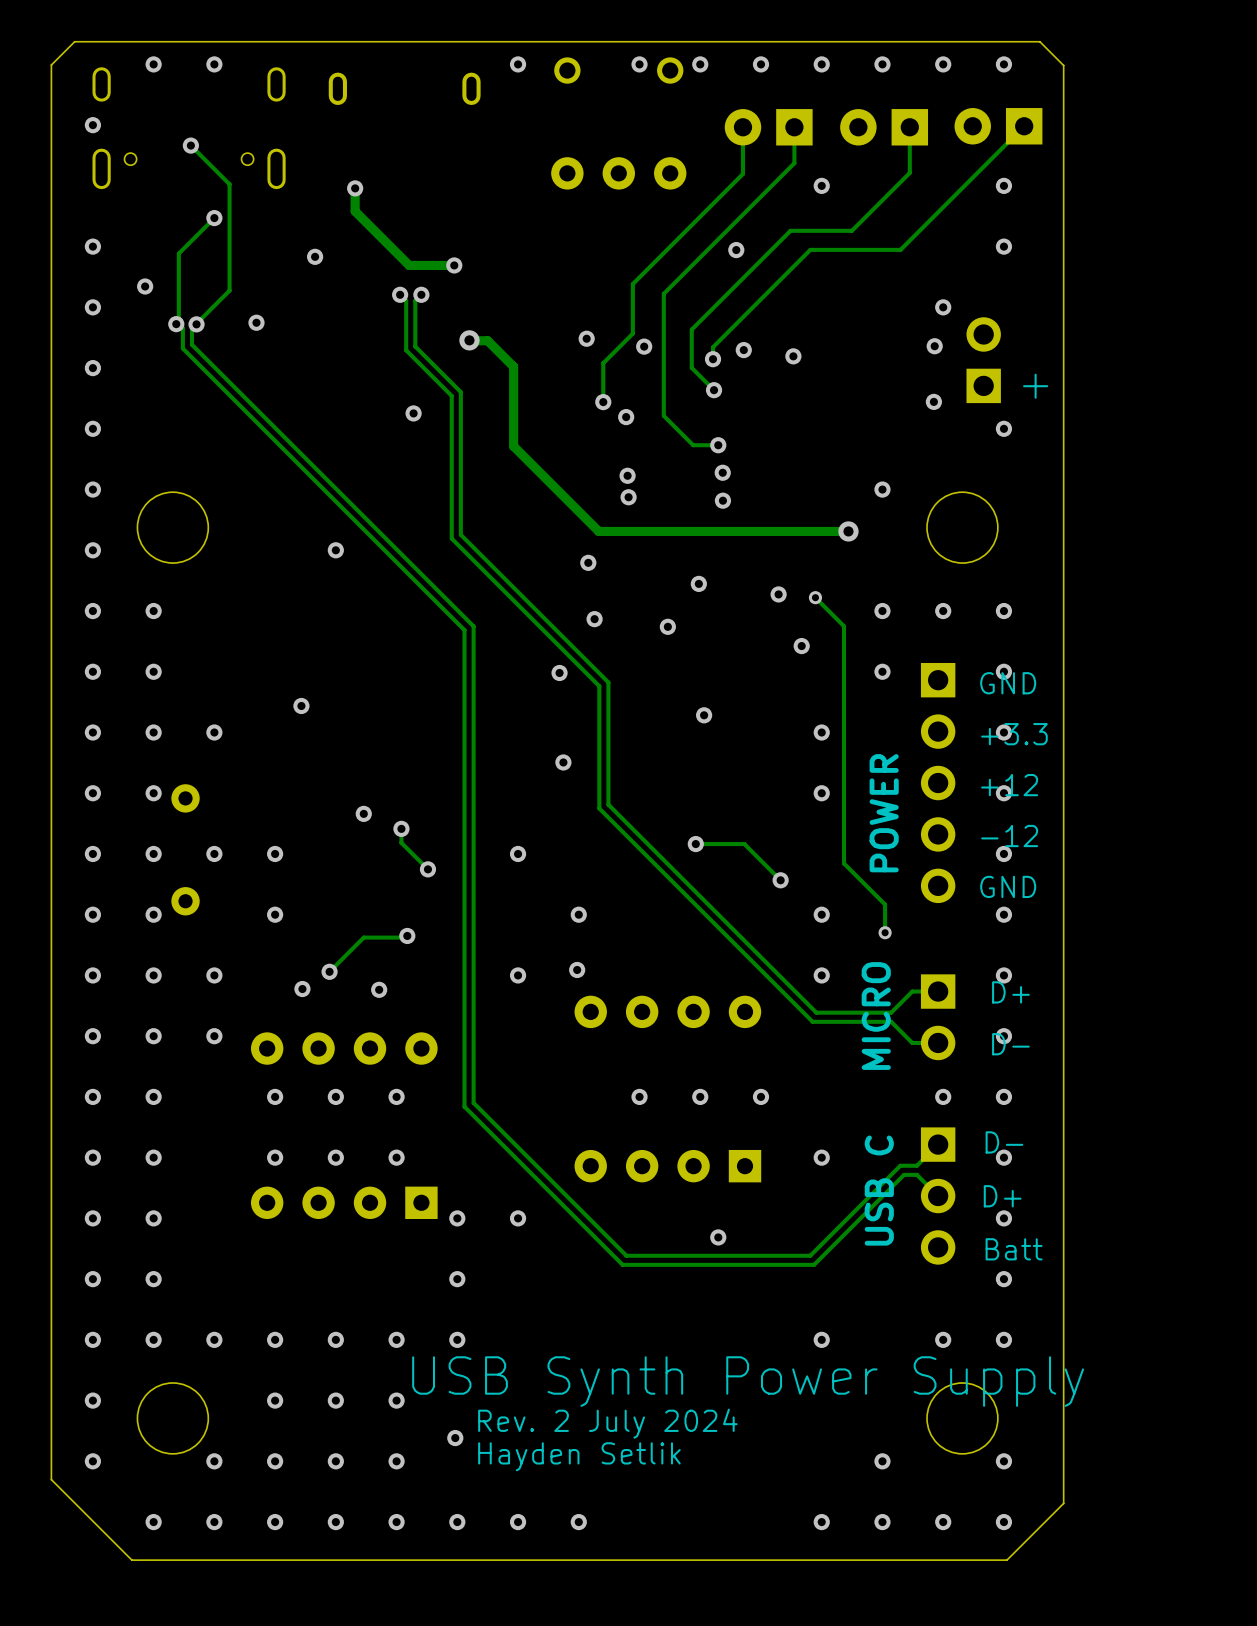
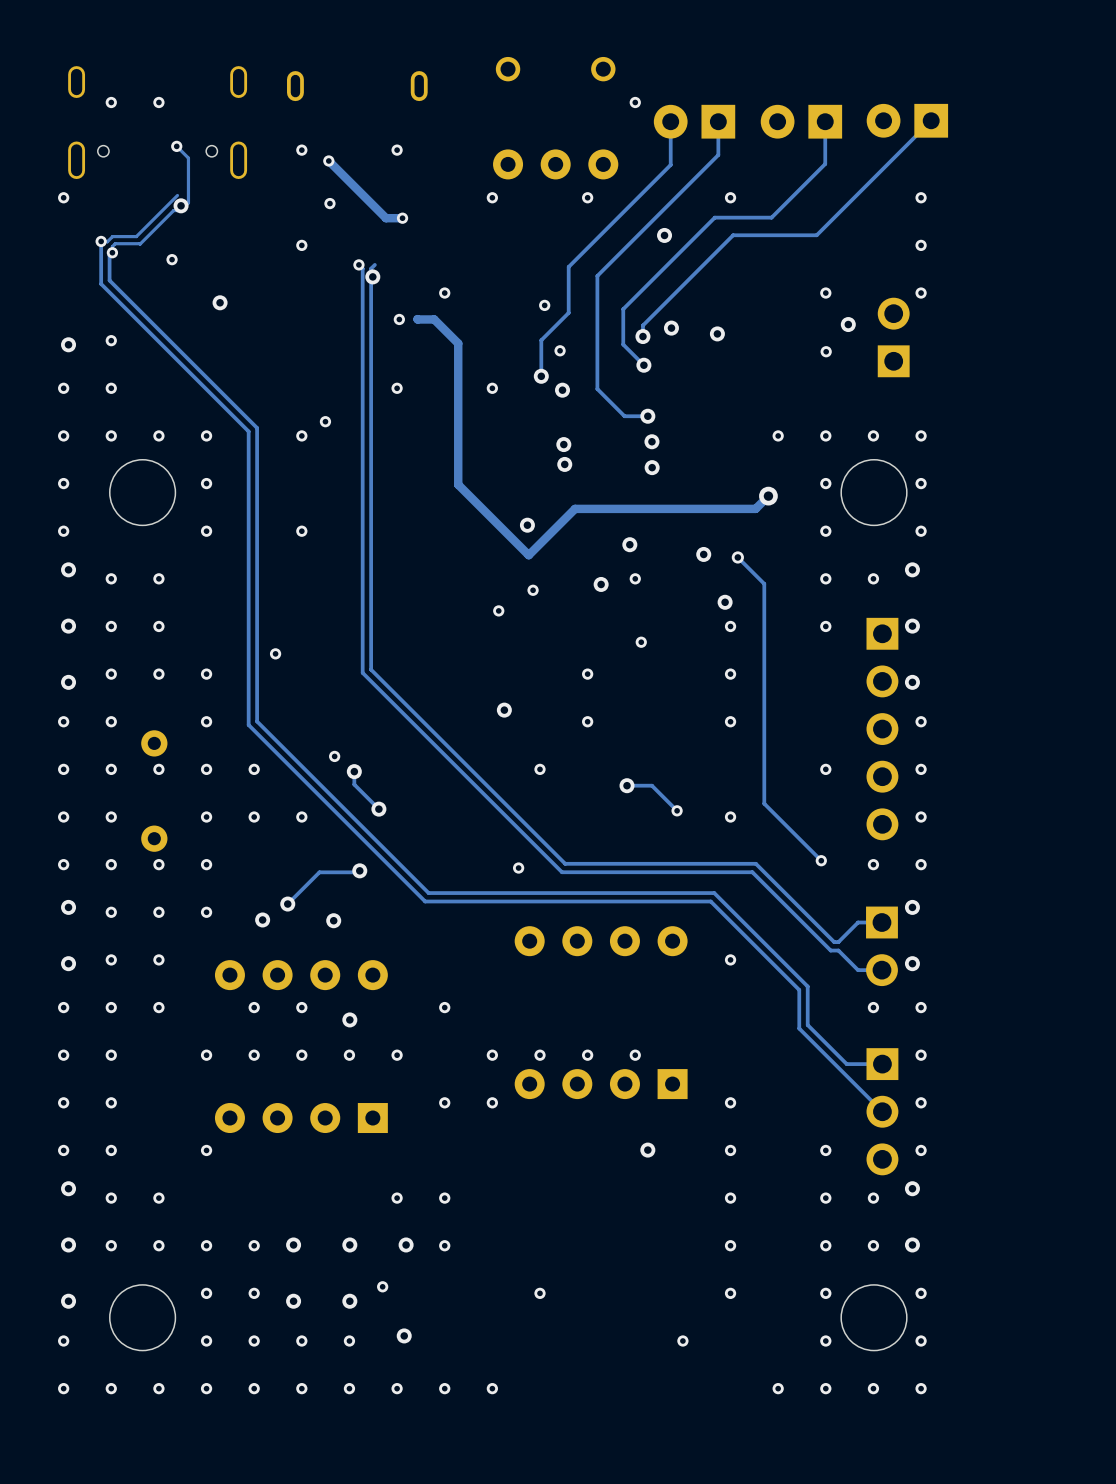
board edge: (1039, 41) (74, 41) (51, 65) (51, 1479) (131, 1560) (1006, 1560) (1063, 1503) (1063, 65) (1039, 41) -> none
via: (153, 64) -> none
via: (214, 64) -> none
via: (518, 64) -> none
via: (639, 64) -> none
via: (700, 64) -> none
via: (761, 64) -> none
via: (821, 64) -> none
via: (882, 64) -> none
via: (943, 64) -> none
via: (1003, 64) -> none
via: none -> (111, 102)
via: none -> (158, 102)
via: none -> (635, 102)
via: (92, 125) -> none
track: (190, 145) (229, 184) (229, 290) (192, 328) (192, 344) (473, 626) (473, 1102) (626, 1255) (810, 1255) (900, 1165) (916, 1165) (938, 1144) -> none
via: (190, 145) -> none
track: none -> (176, 146) (188, 158) (188, 202) (180, 210) (173, 210) (140, 244) (115, 243) (109, 255) (109, 280) (257, 428) (257, 721) (428, 893) (714, 893) (807, 986) (807, 1025) (846, 1064) (882, 1064)
via: none -> (176, 146)
via: none -> (301, 150)
via: none -> (397, 150)
track: none -> (328, 160) (386, 218) (402, 218)
via: none -> (328, 160)
via: (821, 185) -> none
via: (1003, 185) -> none
track: (355, 188) (355, 211) (409, 265) (454, 265) -> none
via: (355, 188) -> none
track: none -> (177, 195) (136, 236) (112, 236) (107, 241) (101, 241) (101, 283) (248, 431) (248, 724) (425, 901) (710, 901) (799, 989) (799, 1028) (882, 1111)
via: none -> (63, 197)
via: none -> (492, 197)
via: none -> (587, 197)
via: none -> (730, 197)
via: none -> (921, 197)
via: none -> (329, 203)
track: (214, 218) (178, 253) (178, 324) (182, 328) (182, 348) (464, 630) (464, 1106) (622, 1264) (814, 1264) (904, 1174) (916, 1174) (938, 1196) -> none
via: none -> (402, 218)
via: (92, 246) -> none
via position: (1003, 246) -> (921, 245)
via: none -> (101, 241)
via: (315, 256) -> none
via: none -> (301, 245)
via: (454, 265) -> none
via: none -> (112, 252)
via: none -> (172, 259)
track: none -> (358, 264) (362, 268) (362, 672) (562, 872) (752, 872) (830, 950) (838, 950) (858, 970) (881, 970)
track: none -> (374, 264) (371, 268) (371, 669) (565, 863) (755, 863) (834, 942) (838, 942) (858, 922) (881, 922)
via: (145, 286) -> none
track: (400, 294) (406, 300) (406, 350) (451, 395) (451, 538) (599, 686) (599, 808) (812, 1021) (891, 1021) (912, 1042) (938, 1042) -> none
via position: (400, 294) -> (358, 264)
track: (421, 294) (415, 300) (415, 346) (460, 392) (460, 534) (608, 682) (608, 804) (816, 1012) (891, 1012) (912, 991) (938, 991) -> none
via: (92, 307) -> none
via: (943, 307) -> none
via: none -> (444, 293)
via: none -> (825, 293)
via: none -> (921, 293)
via: (176, 324) -> none
via: (196, 324) -> none
via: none -> (544, 305)
via: (586, 338) -> none
via: none -> (399, 319)
via: (469, 340) -> none
via: (644, 346) -> none
via: none -> (111, 340)
via: none -> (560, 350)
via: none -> (826, 351)
text: + (1035, 386) -> none
via: (933, 401) -> none
via: (413, 413) -> none
via: none -> (111, 388)
via: none -> (397, 388)
via: none -> (492, 388)
via position: (92, 428) -> (63, 388)
via: (1003, 428) -> none
track: (513, 446) (598, 531) (848, 531) -> (458, 417) (458, 484) (528, 555) (575, 508) (755, 508) (768, 496)
via: none -> (325, 421)
via: none -> (63, 435)
via: none -> (111, 435)
via: none -> (158, 435)
via: none -> (206, 435)
via: none -> (301, 435)
via: none -> (778, 435)
via: none -> (825, 435)
via: none -> (873, 435)
via: none -> (921, 435)
via: (92, 489) -> none
via: (882, 489) -> none
via: none -> (63, 483)
via: none -> (206, 483)
via: none -> (825, 483)
via: none -> (921, 483)
via: (92, 550) -> none
via: (335, 550) -> none
via: none -> (63, 531)
via: none -> (206, 531)
via: none -> (301, 531)
via: none -> (825, 531)
via: none -> (921, 531)
via: (153, 611) -> none
via: (882, 611) -> none
via: (943, 611) -> none
via position: (594, 619) -> (533, 590)
via: none -> (111, 578)
via: none -> (158, 578)
via: none -> (635, 578)
via: none -> (825, 578)
via: none -> (873, 578)
via: none -> (498, 610)
via: (153, 671) -> none
via: (882, 671) -> none
via: none -> (111, 626)
via: none -> (158, 626)
via: (559, 672) -> none
via: none -> (730, 626)
via: none -> (825, 626)
text: GND (1008, 683) -> none
via: none -> (641, 642)
via: none -> (275, 653)
via: (301, 705) -> none
via: (704, 715) -> none
via: none -> (111, 674)
via: none -> (158, 674)
via: none -> (206, 674)
via: none -> (587, 674)
via: (153, 732) -> none
via: (214, 732) -> none
via position: (821, 732) -> (730, 674)
text: +3.3 (1014, 734) -> none
via: none -> (63, 721)
via: none -> (111, 721)
via: none -> (206, 721)
via: none -> (587, 721)
via: none -> (730, 721)
via: none -> (921, 721)
part position: (938, 783) -> (882, 729)
text: +12 (1009, 785) -> none
via: (92, 793) -> none
via: (153, 793) -> none
via: (821, 793) -> none
via: (1003, 793) -> none
via: none -> (334, 756)
via: (363, 813) -> none
text: POWER (884, 813) -> none
via: none -> (63, 769)
via: none -> (111, 769)
via: none -> (158, 769)
via: none -> (206, 769)
via: none -> (254, 769)
via: none -> (540, 769)
via: none -> (825, 769)
via: none -> (921, 769)
text: -12 (1009, 836) -> none
track: (722, 844) (744, 844) (780, 880) -> (651, 785) (677, 810)
via: (92, 853) -> none
via: (153, 853) -> none
via: (214, 853) -> none
via: (275, 853) -> none
via: (518, 853) -> none
via: (1003, 853) -> none
via: none -> (677, 810)
via: none -> (63, 817)
via: none -> (111, 817)
via: none -> (206, 817)
via: none -> (254, 817)
via: none -> (301, 817)
via: none -> (730, 817)
via: none -> (921, 817)
via: (780, 880) -> none
text: GND (1008, 886) -> none
track: (885, 904) (885, 932) -> (802, 841) (821, 860)
via: (92, 914) -> none
via: (153, 914) -> none
via: (275, 914) -> none
via: (578, 914) -> none
via: (821, 914) -> none
via: (1003, 914) -> none
via: none -> (821, 860)
via: none -> (63, 864)
via: none -> (111, 864)
via: none -> (158, 864)
via: none -> (206, 864)
via: none -> (873, 864)
via: none -> (921, 864)
via: none -> (518, 868)
via: (885, 932) -> none
via: (577, 969) -> none
via: (153, 975) -> none
via: (214, 975) -> none
via: (518, 975) -> none
via: (821, 975) -> none
via: none -> (111, 912)
via: none -> (158, 912)
via: none -> (206, 912)
text: D+ (1010, 992) -> none
text: MICRO (876, 1016) -> none
part position: (938, 1017) -> (881, 946)
via: none -> (111, 959)
via: none -> (158, 959)
via: none -> (730, 959)
via: (153, 1036) -> none
via: (214, 1036) -> none
text: D- (1010, 1044) -> none
via: none -> (111, 1007)
via: none -> (158, 1007)
via: none -> (254, 1007)
via: none -> (444, 1007)
via: none -> (873, 1007)
via position: (92, 1096) -> (63, 1007)
via: (153, 1096) -> none
via: (275, 1096) -> none
via position: (335, 1096) -> (301, 1007)
via: (639, 1096) -> none
via: (700, 1096) -> none
via: (761, 1096) -> none
via: (943, 1096) -> none
via position: (1003, 1096) -> (921, 1007)
via: none -> (63, 1055)
via: none -> (111, 1055)
via: none -> (206, 1055)
via: none -> (254, 1055)
via: none -> (301, 1055)
via: none -> (349, 1055)
via: none -> (397, 1055)
via: none -> (492, 1055)
via: none -> (540, 1055)
via: none -> (587, 1055)
via: none -> (635, 1055)
via: none -> (921, 1055)
text: D- (1004, 1142) -> none
via: (92, 1157) -> none
via: (153, 1157) -> none
via: (275, 1157) -> none
via: (335, 1157) -> none
via: (396, 1157) -> none
via: (821, 1157) -> none
via: (1003, 1157) -> none
via: none -> (63, 1102)
via: none -> (111, 1102)
via: none -> (444, 1102)
via: none -> (492, 1102)
via: none -> (730, 1102)
via: none -> (921, 1102)
text: USB C (879, 1190) -> none
part position: (938, 1196) -> (882, 1111)
text: D+ (1002, 1196) -> none
via: (92, 1218) -> none
via: (153, 1218) -> none
via: (457, 1218) -> none
via: (518, 1218) -> none
via: (1003, 1218) -> none
via: none -> (63, 1150)
via: none -> (111, 1150)
via: none -> (206, 1150)
via: none -> (730, 1150)
via: none -> (825, 1150)
via: none -> (921, 1150)
text: Batt (1014, 1249) -> none
via: (153, 1279) -> none
via position: (457, 1279) -> (397, 1198)
via: none -> (111, 1198)
via: none -> (158, 1198)
via: none -> (444, 1198)
via: none -> (730, 1198)
via: none -> (825, 1198)
via: none -> (873, 1198)
via: (153, 1339) -> none
via: (214, 1339) -> none
via: (275, 1339) -> none
via position: (821, 1339) -> (730, 1245)
via: (943, 1339) -> none
via: none -> (111, 1245)
via: none -> (158, 1245)
via: none -> (206, 1245)
via: none -> (254, 1245)
via: none -> (444, 1245)
via: none -> (825, 1245)
via: none -> (873, 1245)
text: USB Synth Power Supply (748, 1381) -> none
via: none -> (382, 1286)
via: none -> (206, 1293)
via: none -> (254, 1293)
via: none -> (540, 1293)
via: none -> (730, 1293)
via: none -> (825, 1293)
via: none -> (921, 1293)
via: (275, 1400) -> none
text: Rev. 2 July 2024 (607, 1423) -> none
via: none -> (63, 1341)
via: none -> (206, 1341)
via: none -> (254, 1341)
via: none -> (301, 1341)
via: none -> (349, 1341)
via: none -> (682, 1341)
via: none -> (825, 1341)
via: none -> (921, 1341)
text: Hayden Setlik (579, 1456) -> none
via: (92, 1461) -> none
via: (214, 1461) -> none
via: (275, 1461) -> none
via: (335, 1461) -> none
via: (396, 1461) -> none
via: (882, 1461) -> none
via: (1003, 1461) -> none
via: none -> (63, 1388)
via: none -> (111, 1388)
via: none -> (158, 1388)
via: none -> (206, 1388)
via: none -> (254, 1388)
via: none -> (301, 1388)
via: none -> (349, 1388)
via: none -> (397, 1388)
via: none -> (444, 1388)
via: none -> (492, 1388)
via: none -> (778, 1388)
via: none -> (825, 1388)
via: none -> (873, 1388)
via: none -> (921, 1388)
via: (153, 1522) -> none
via: (214, 1522) -> none
via: (275, 1522) -> none
via: (335, 1522) -> none
via: (396, 1522) -> none
via: (457, 1522) -> none
via: (518, 1522) -> none
via: (578, 1522) -> none
via: (821, 1522) -> none
via: (882, 1522) -> none
via: (943, 1522) -> none
via: (1003, 1522) -> none

